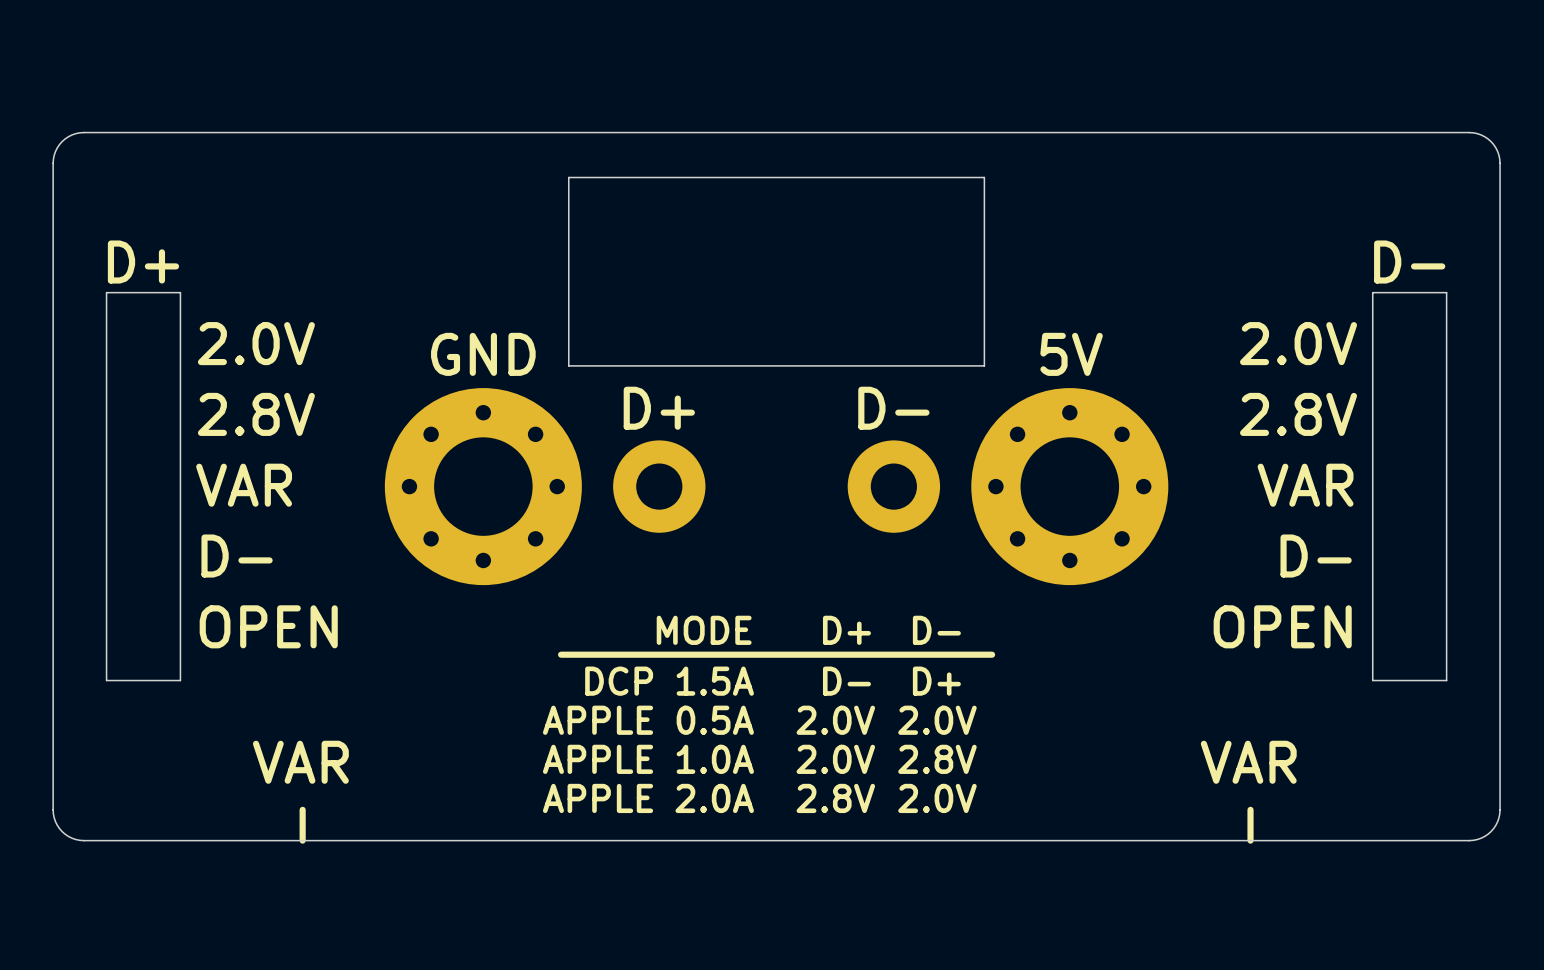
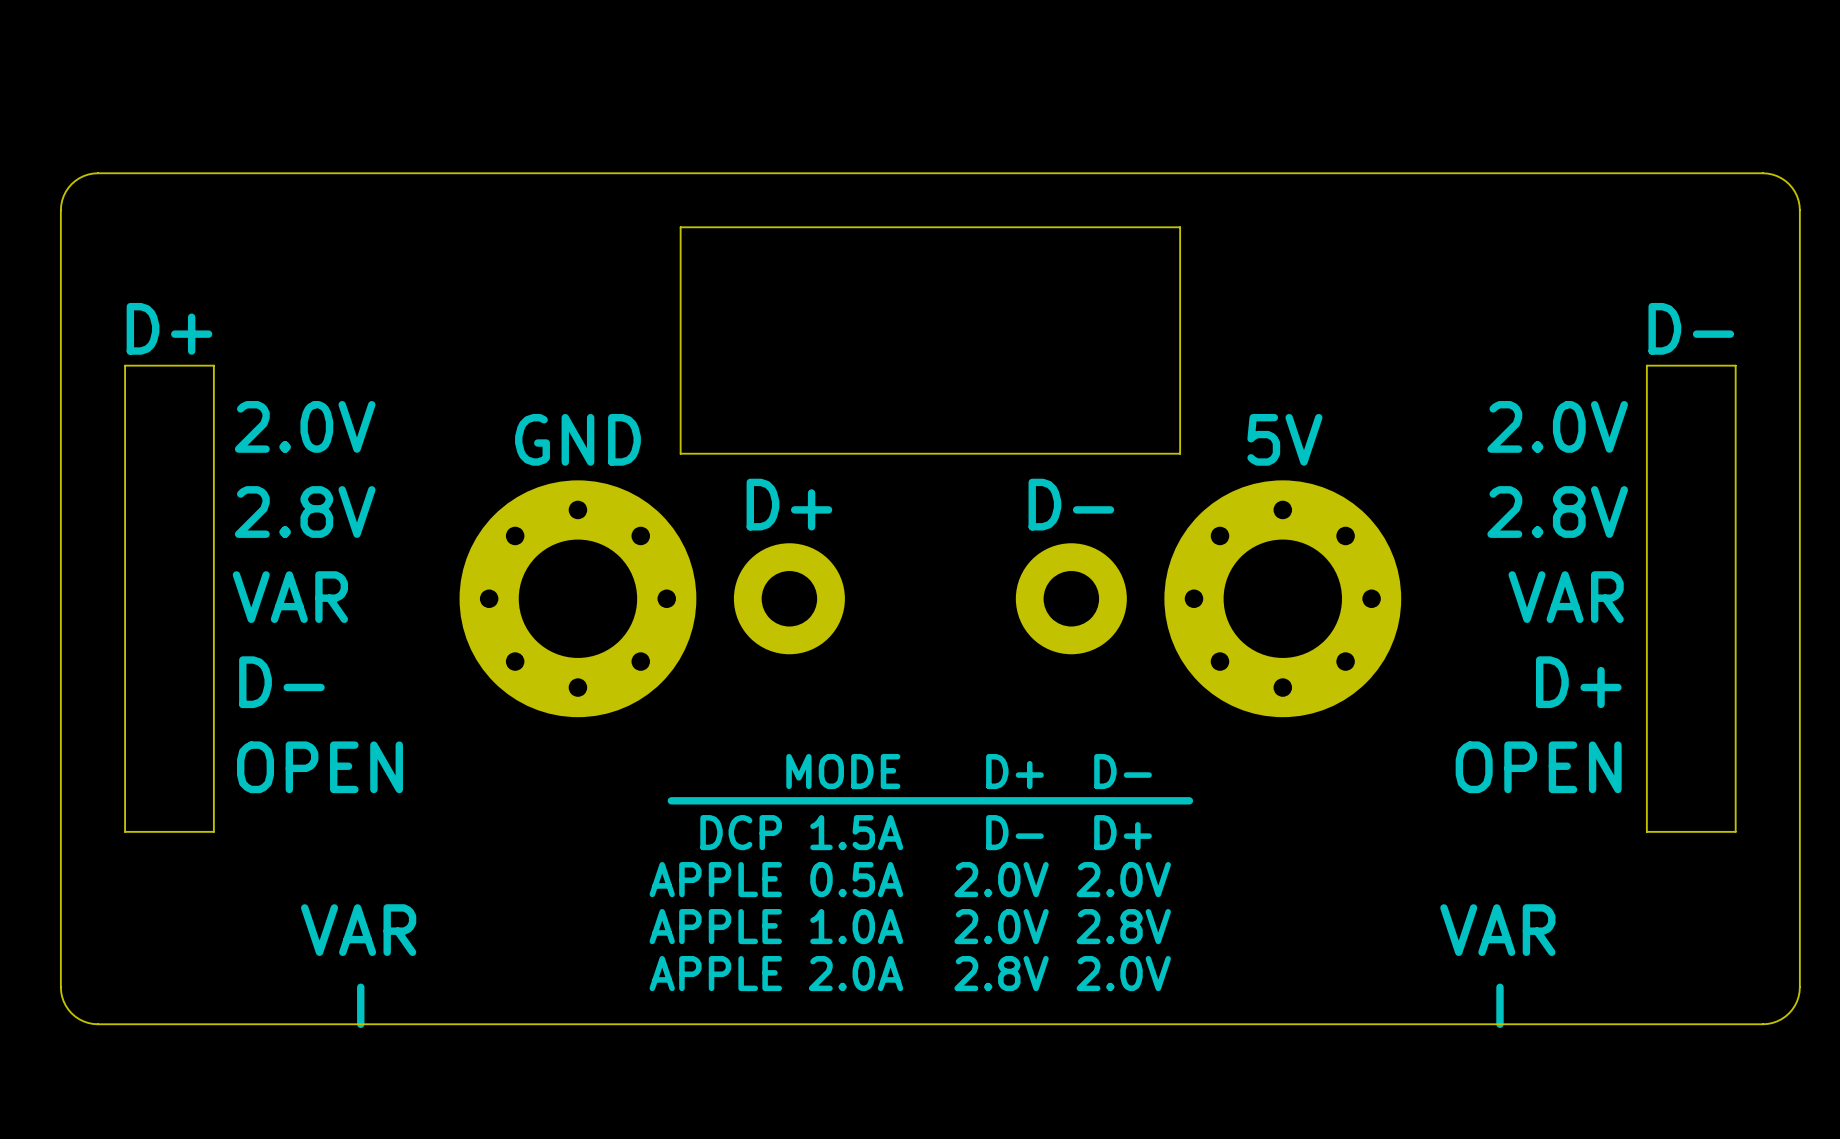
text: D- (1316, 556) -> D+ (1578, 682)

